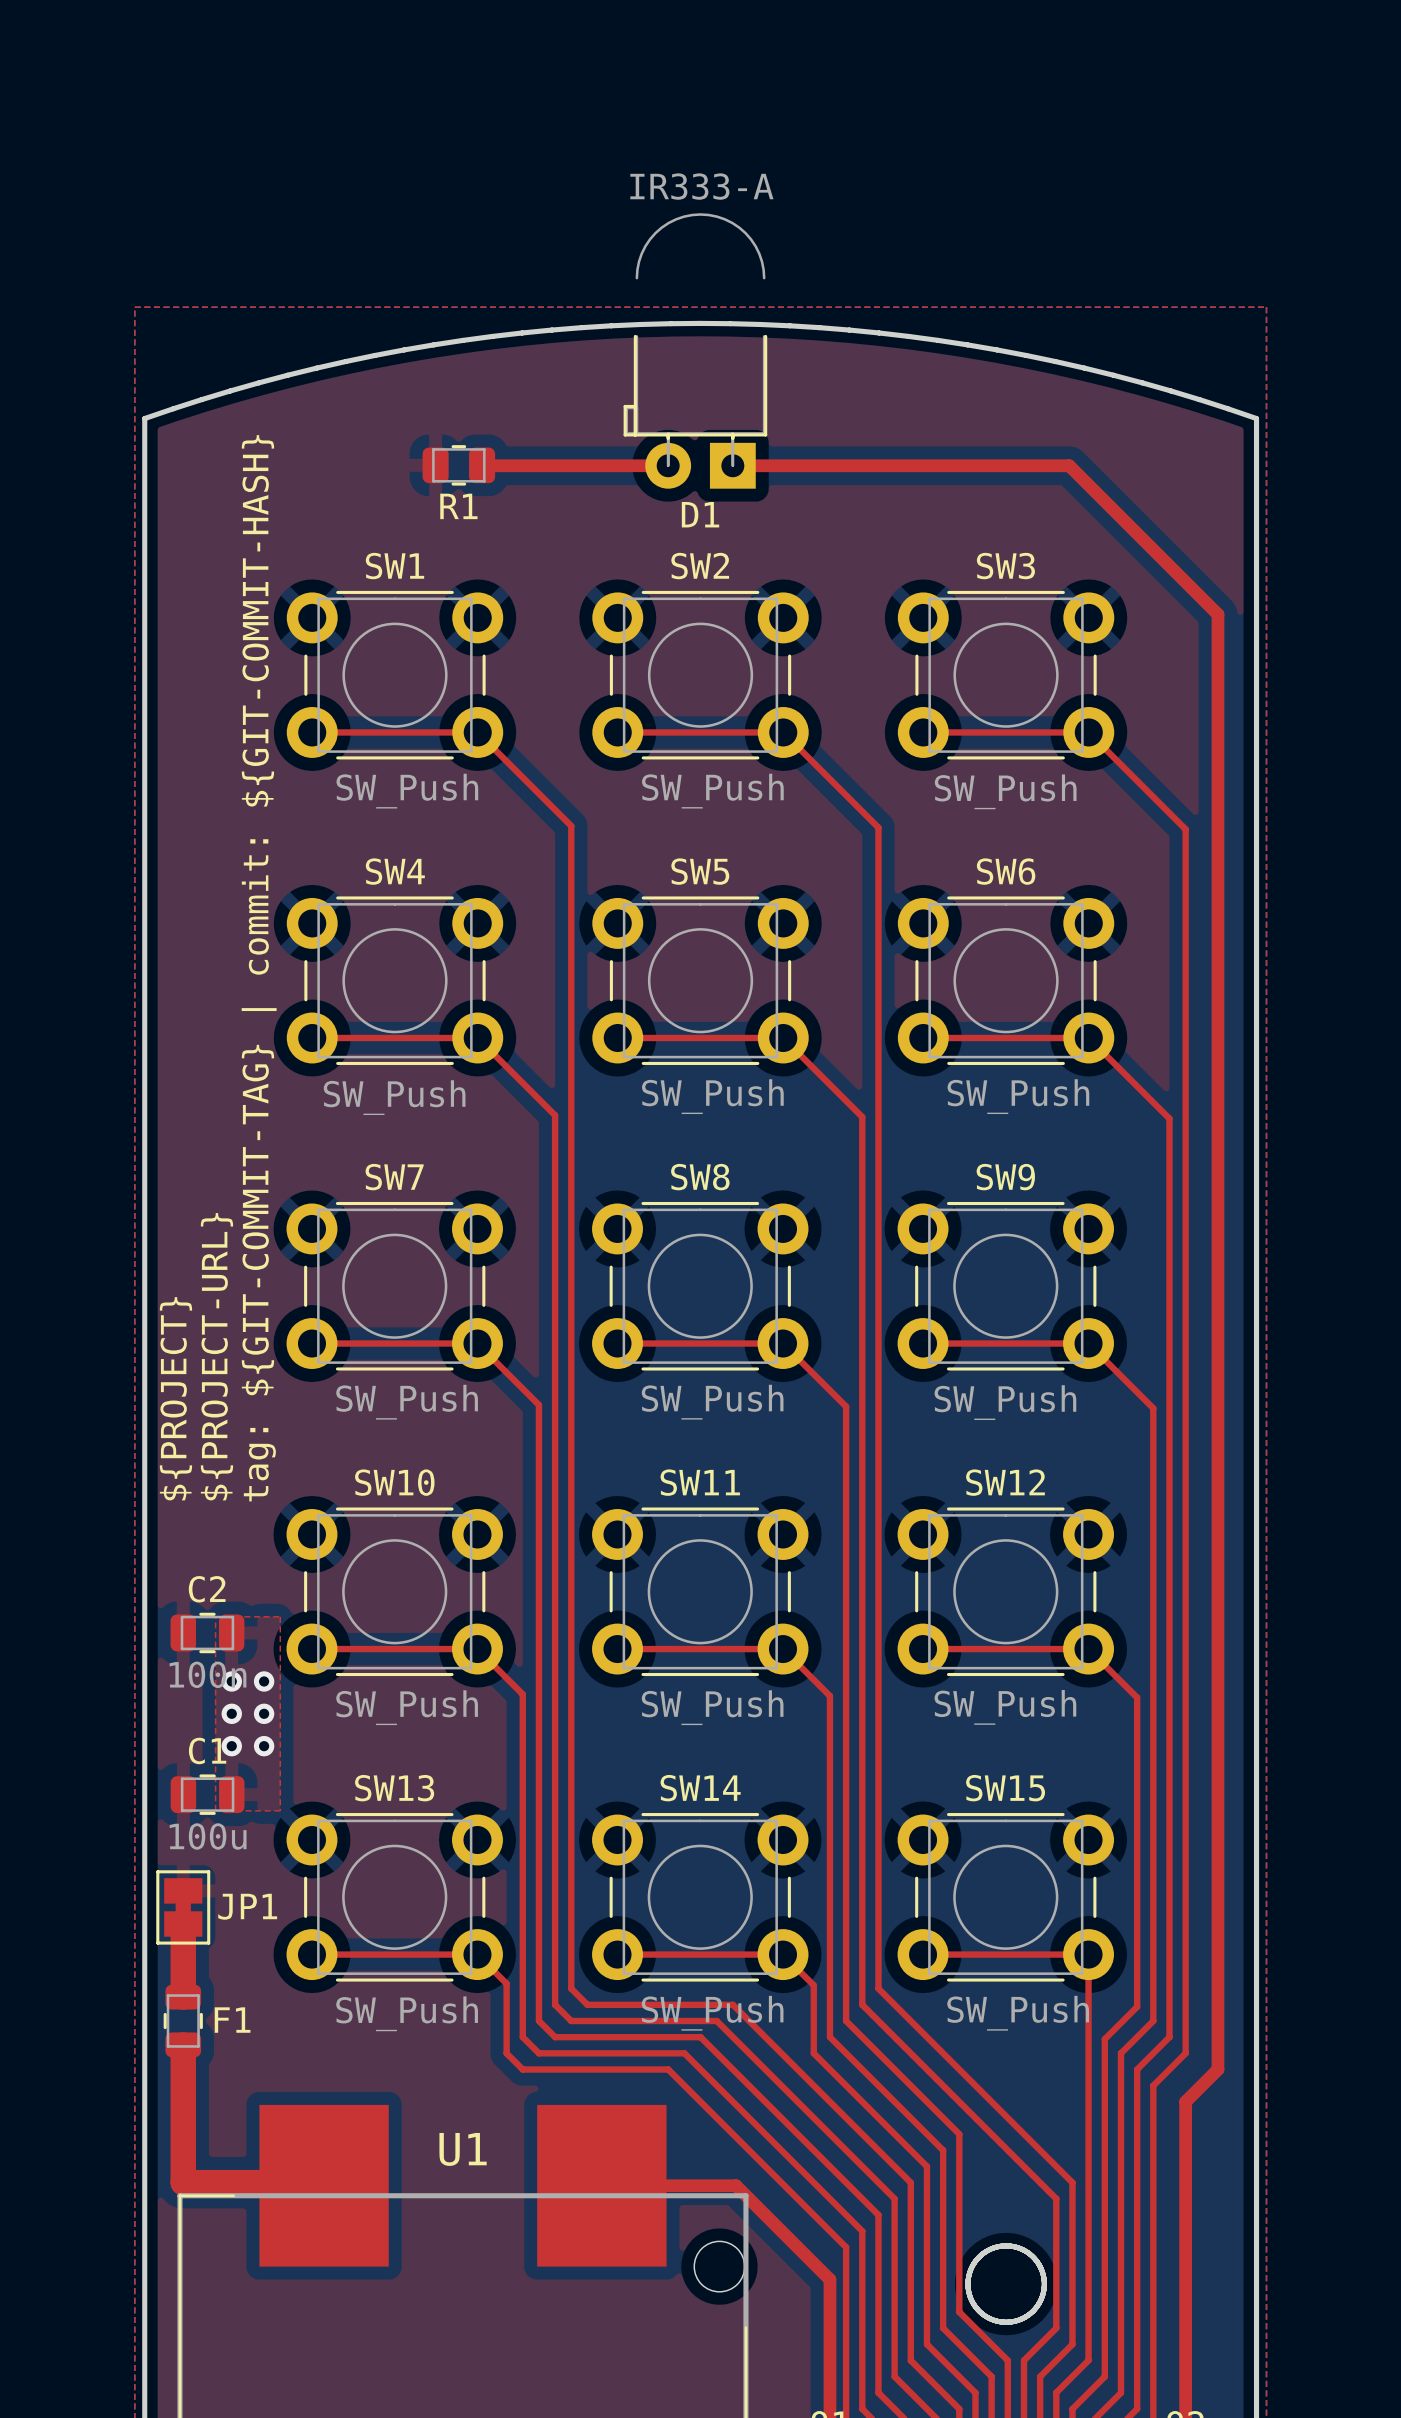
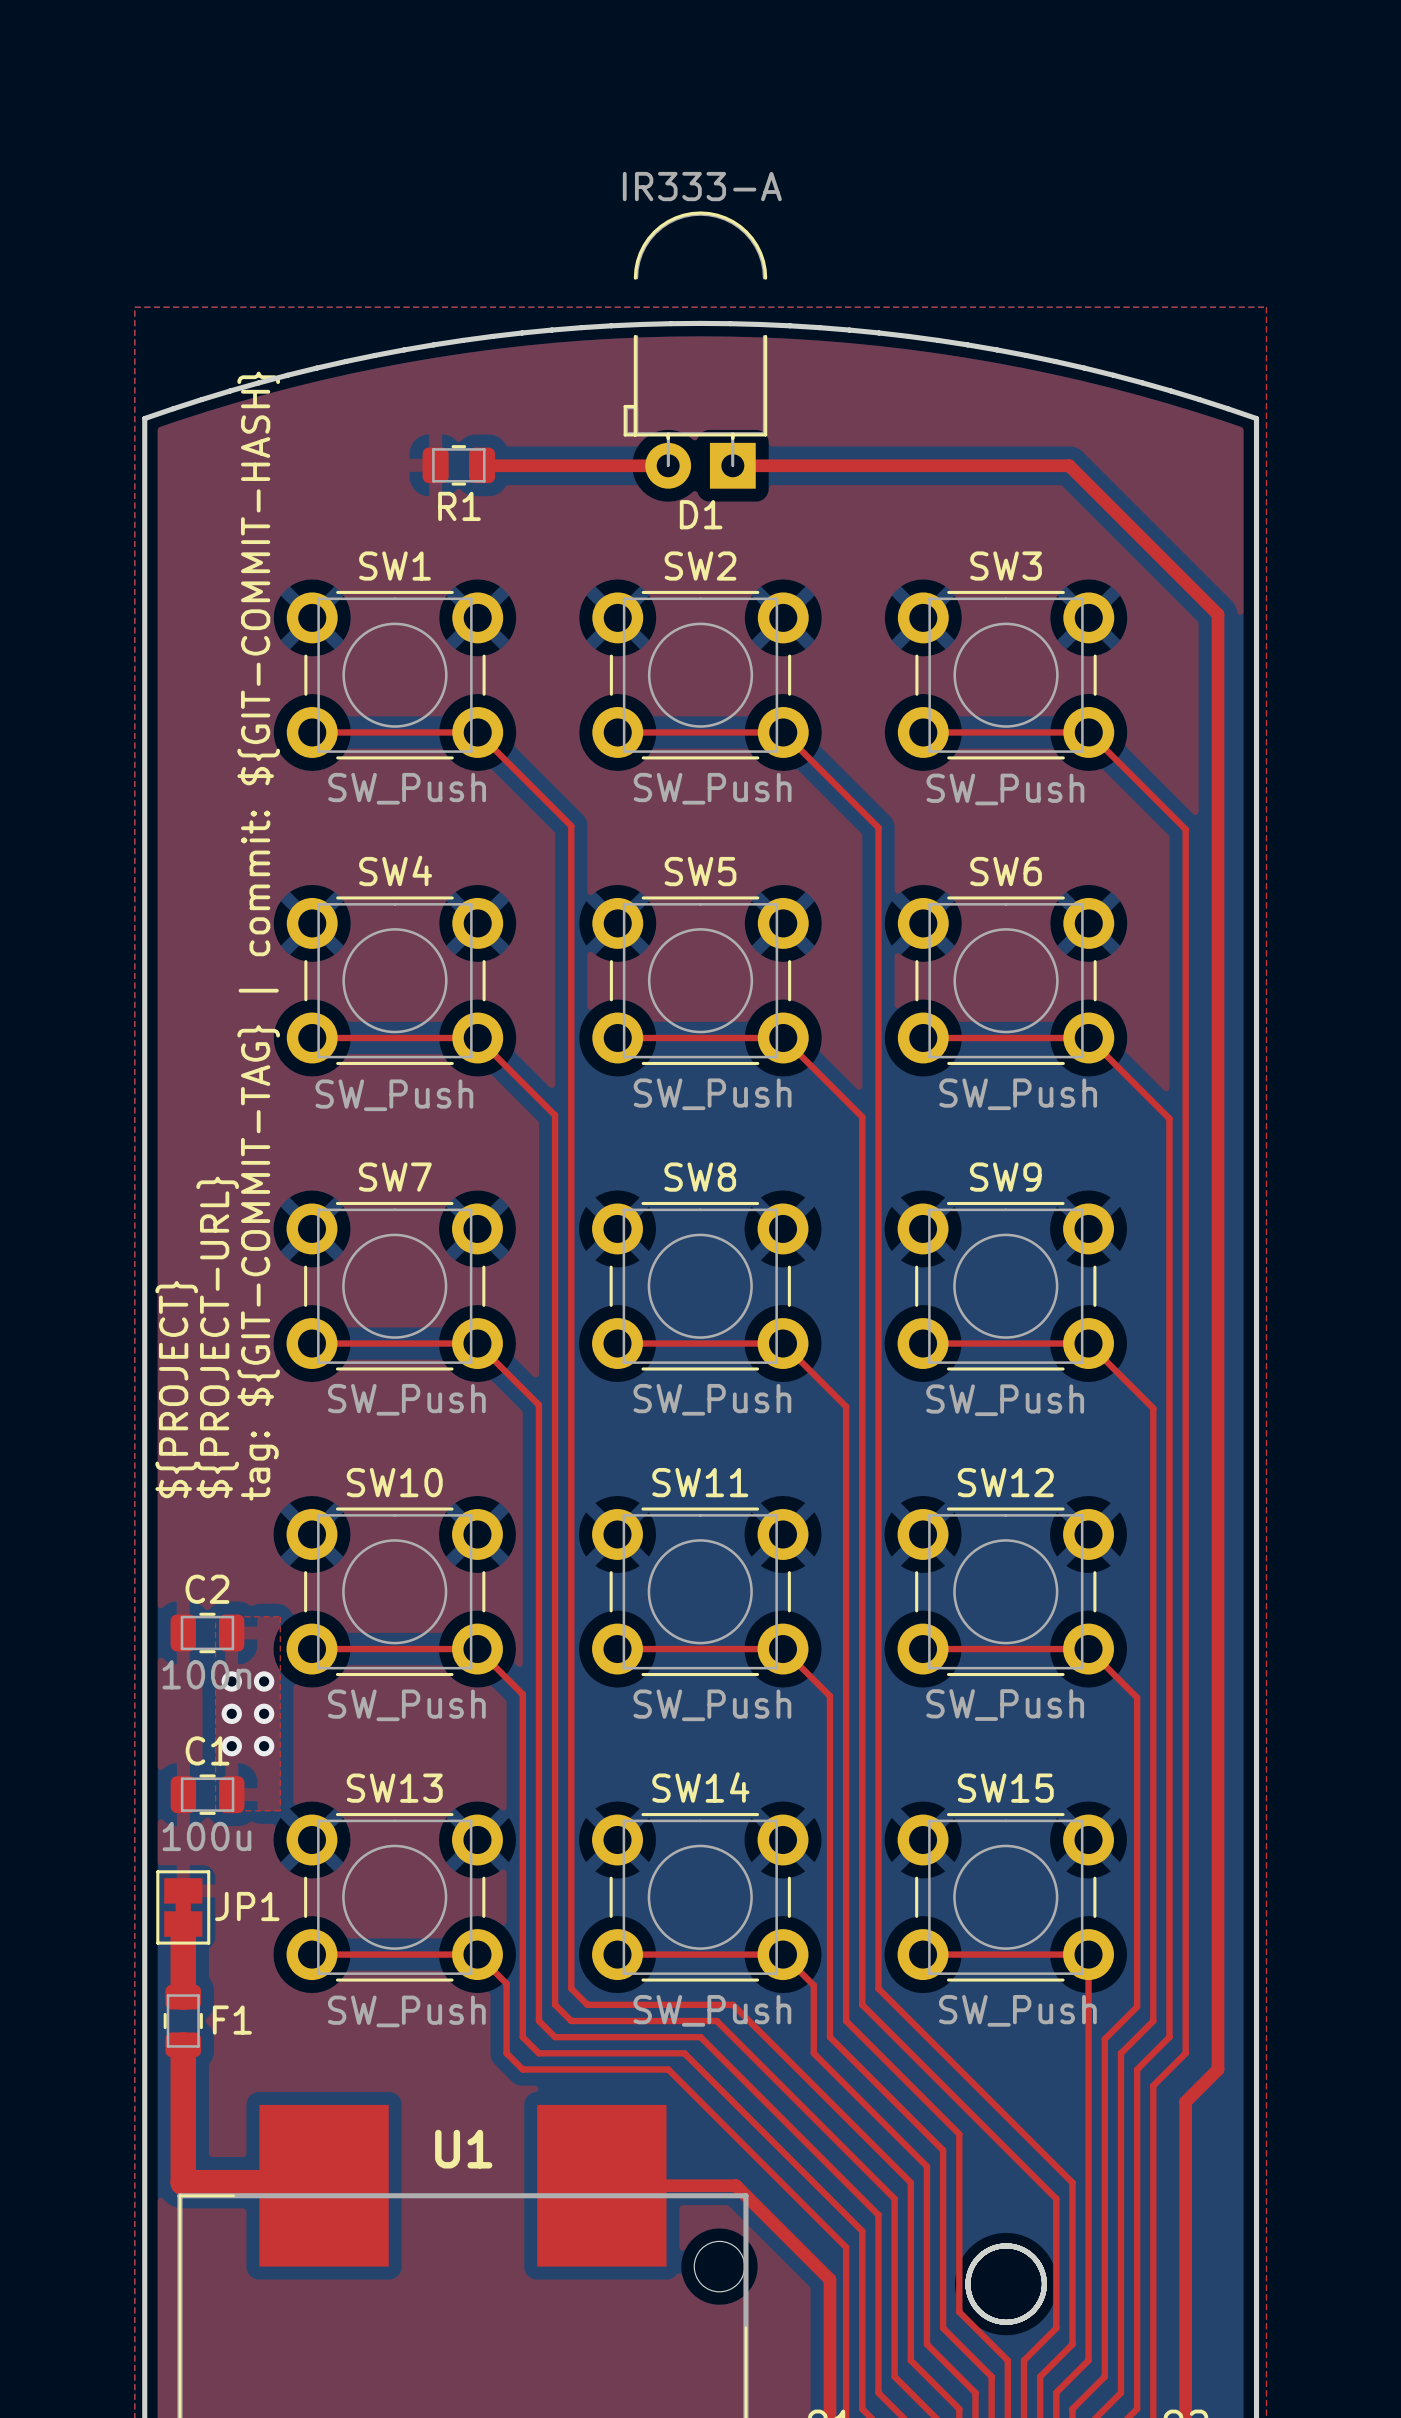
D1 footprint: [623, 213, 768, 489] -> [623, 211, 768, 489]

